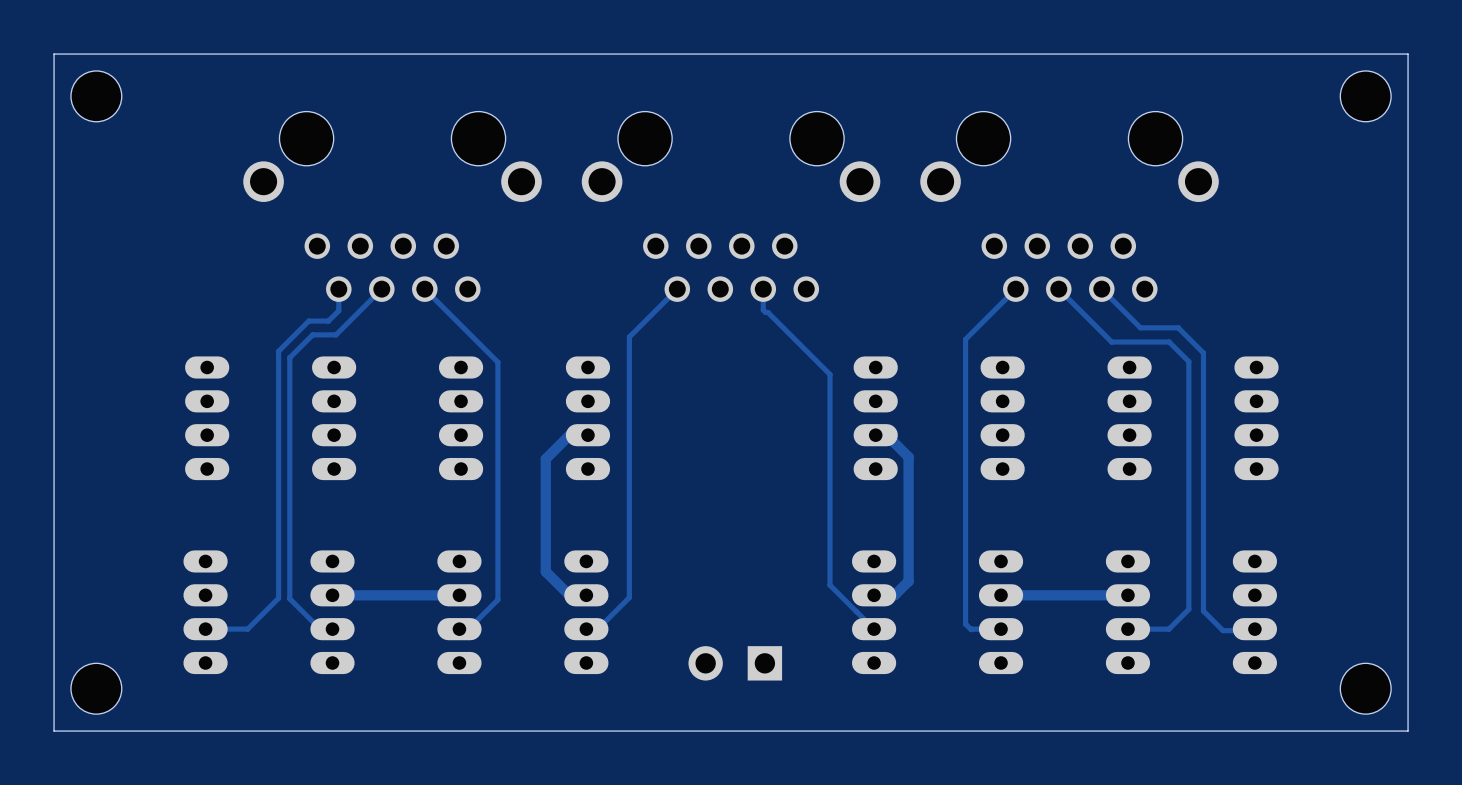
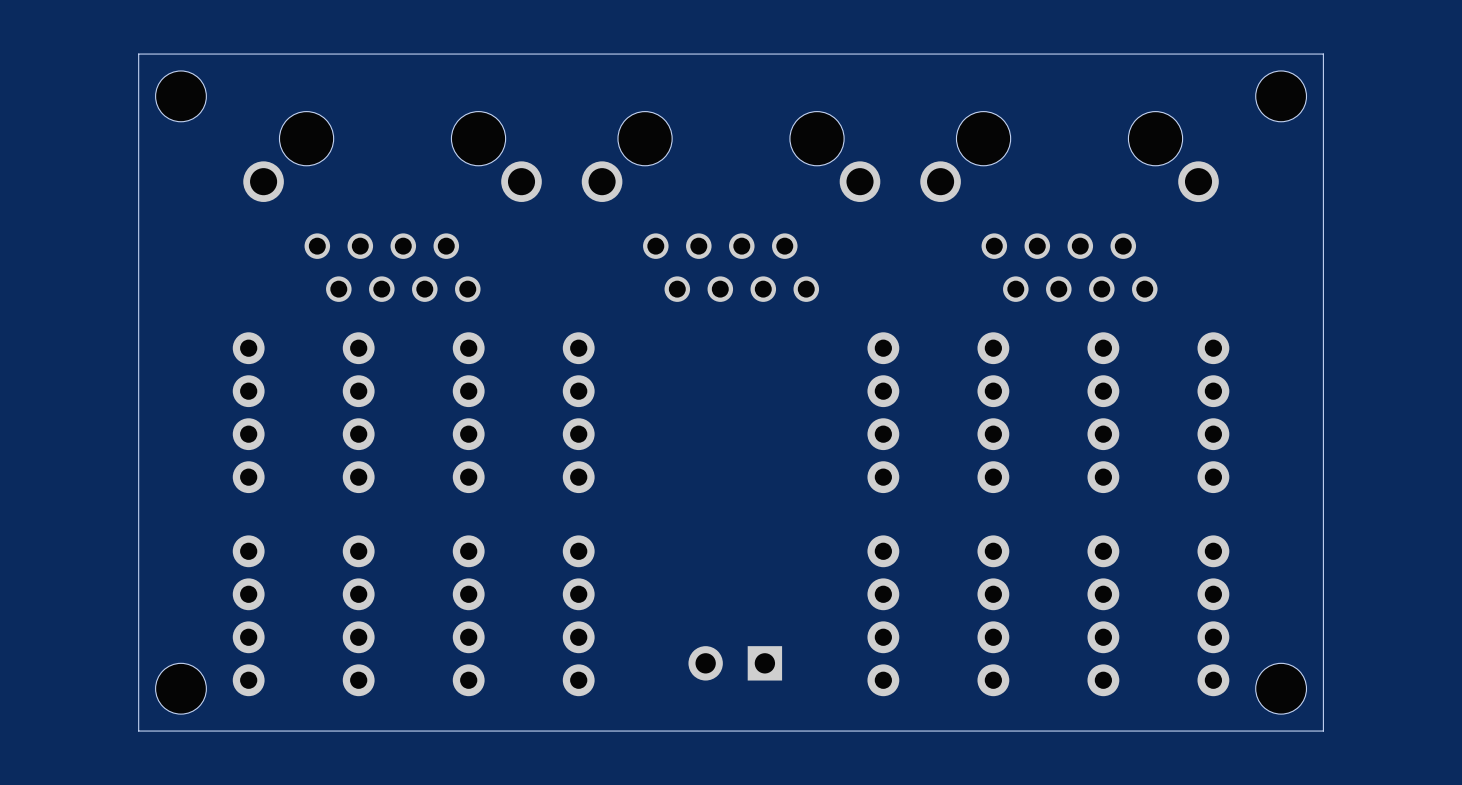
board edge: (138, 54) (54, 54) (54, 731) (138, 731) -> (138, 54) (138, 731)
board edge: (1323, 54) (1408, 54) (1408, 731) (1323, 731) -> (1323, 54) (1323, 731)
hole position: (96, 96) -> (180, 96)
hole position: (1365, 96) -> (1281, 96)
track: (338, 289) (338, 310) (328, 321) (308, 321) (278, 351) (278, 598) (247, 629) (205, 629) -> none
track: (381, 289) (336, 334) (312, 334) (289, 357) (289, 598) (320, 629) (332, 629) -> none
track: (424, 289) (497, 362) (497, 599) (468, 629) (459, 629) -> none
track: (677, 289) (629, 337) (629, 597) (597, 629) (586, 629) -> none
track: (763, 289) (763, 310) (767, 312) (830, 374) (830, 585) (874, 629) -> none
track: (1015, 289) (965, 339) (965, 624) (971, 629) (1001, 629) -> none
track: (1058, 289) (1111, 342) (1169, 342) (1188, 361) (1188, 609) (1169, 629) (1127, 629) -> none
track: (1101, 289) (1140, 327) (1178, 327) (1203, 353) (1203, 611) (1223, 630) (1254, 629) -> none
part footprint: [438, 356, 484, 481] -> [452, 332, 485, 494]
part footprint: [565, 356, 611, 481] -> [562, 332, 595, 494]
part footprint: [853, 356, 898, 481] -> [867, 332, 900, 494]
part footprint: [980, 356, 1025, 481] -> [977, 332, 1010, 494]
part: none -> (248, 412)
part: none -> (358, 412)
part: none -> (1103, 412)
part: none -> (1213, 412)
part: (207, 418) -> none
part: (334, 418) -> none
part: (1129, 418) -> none
part: (1256, 418) -> none
track: (587, 435) (569, 435) (545, 459) (545, 571) (569, 595) (586, 595) -> none
track: (875, 435) (886, 435) (908, 457) (908, 581) (894, 595) (874, 595) -> none
part footprint: [437, 550, 482, 675] -> [452, 535, 485, 697]
part footprint: [564, 550, 609, 675] -> [562, 535, 595, 697]
part footprint: [851, 550, 897, 675] -> [867, 535, 900, 697]
part footprint: [978, 550, 1024, 675] -> [977, 535, 1010, 697]
track: (459, 595) (332, 595) -> none
track: (1127, 595) (1001, 595) -> none
part: (205, 612) -> none
part: (332, 612) -> none
part: (1127, 612) -> none
part: (1254, 612) -> none
part: none -> (248, 615)
part: none -> (358, 615)
part: none -> (1103, 615)
part: none -> (1213, 615)
hole position: (96, 688) -> (180, 688)
hole position: (1365, 688) -> (1281, 688)

